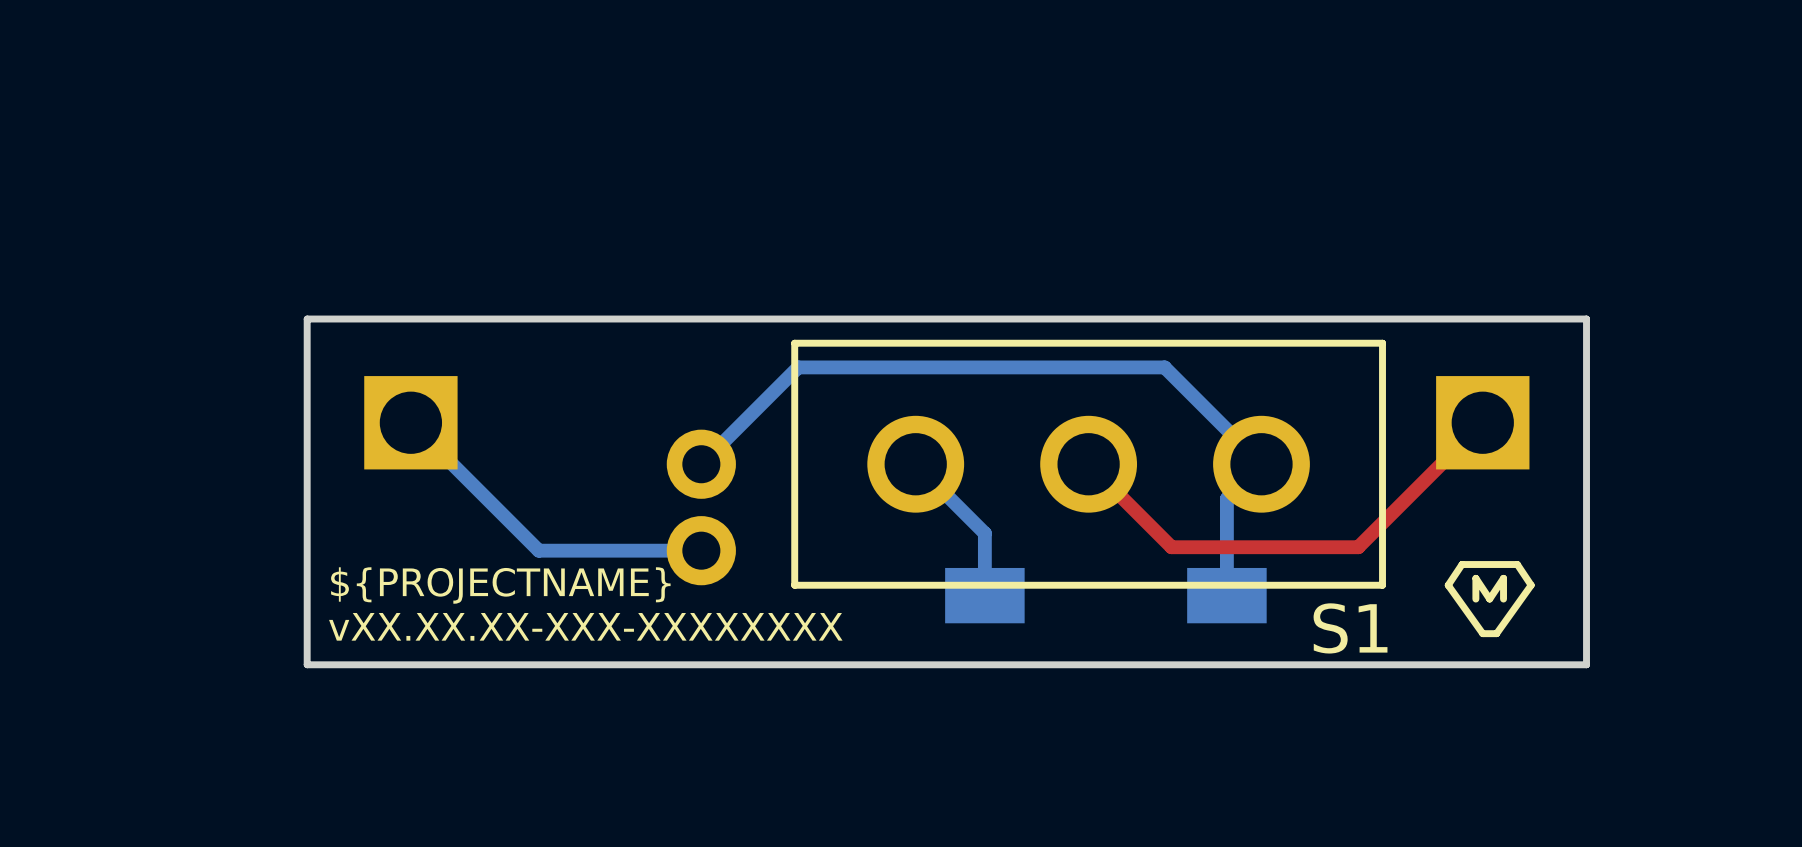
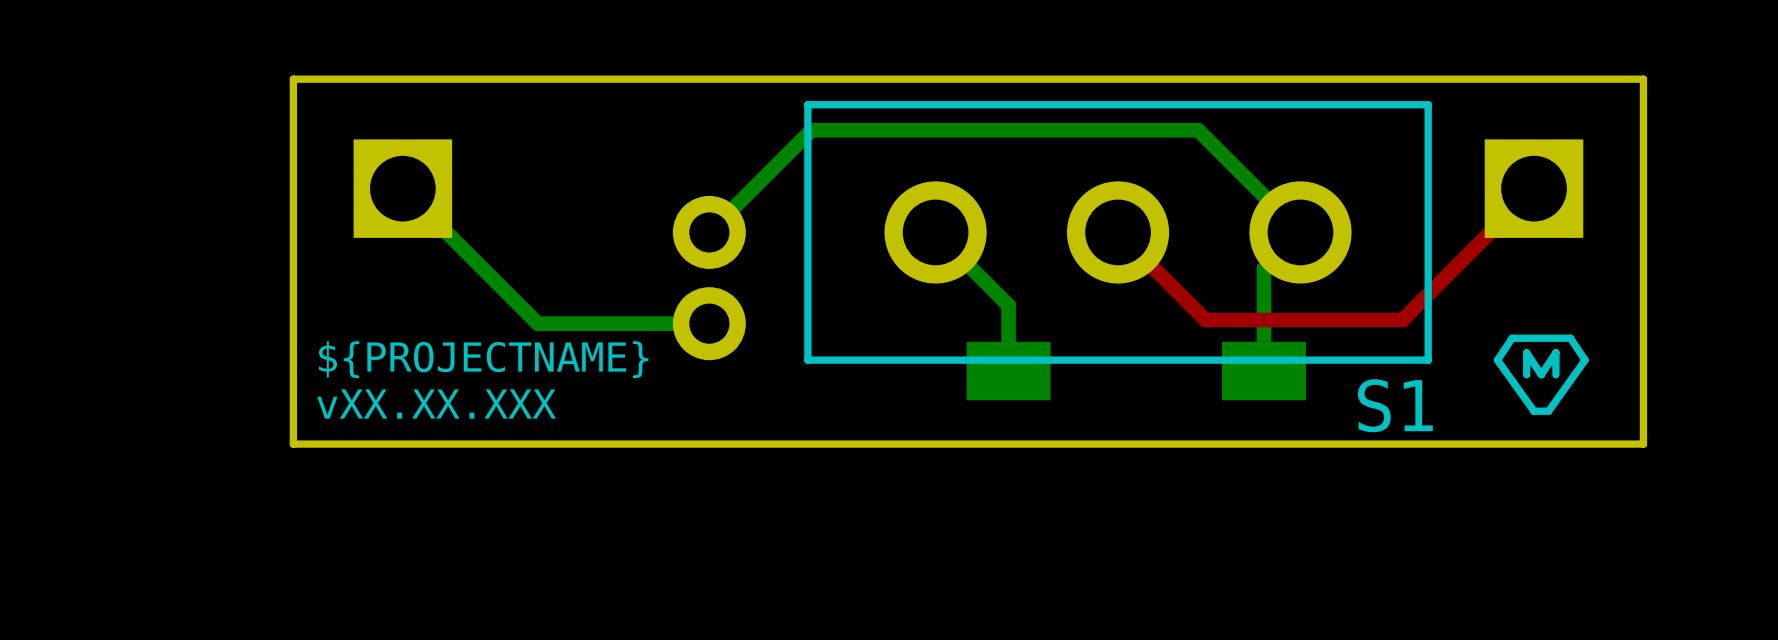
text: vXX.XX.XX-XXX-XXXXXXXX (585, 626) -> vXX.XX.XXX (436, 404)

